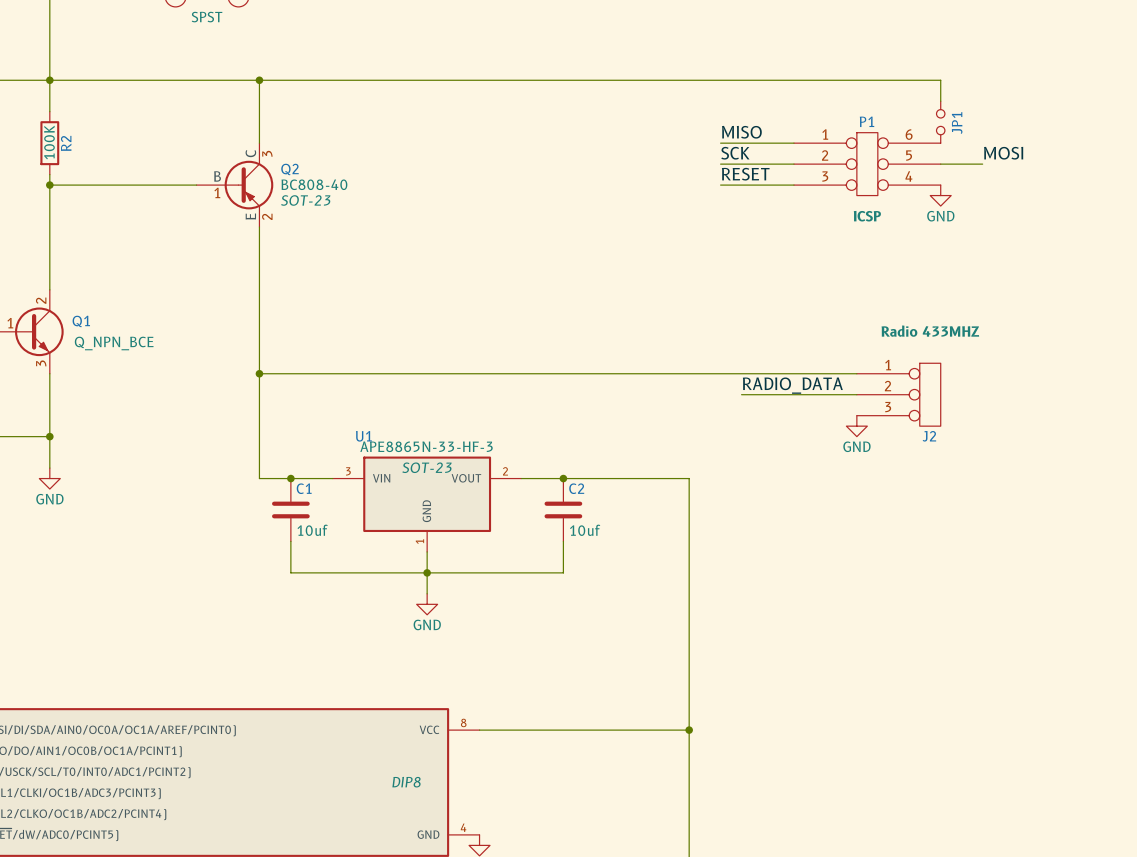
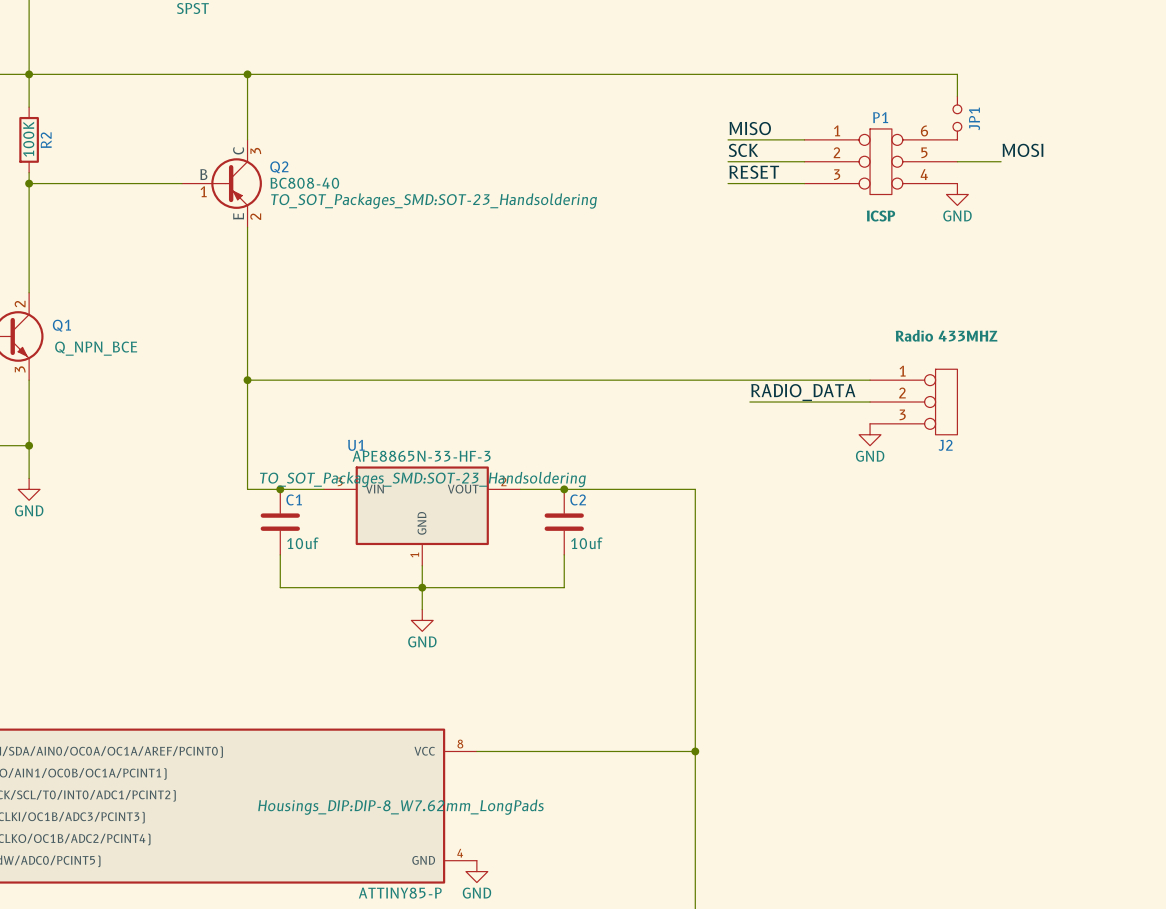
Q2 text: SOT-23 (305, 200) -> TO_SOT_Packages_SMD:SOT-23_Handsoldering (434, 201)
U1 text: SOT-23 (426, 467) -> TO_SOT_Packages_SMD:SOT-23_Handsoldering (422, 479)
part text: DIP8 (406, 782) -> Housings_DIP:DIP-8_W7.62mm_LongPads (400, 807)

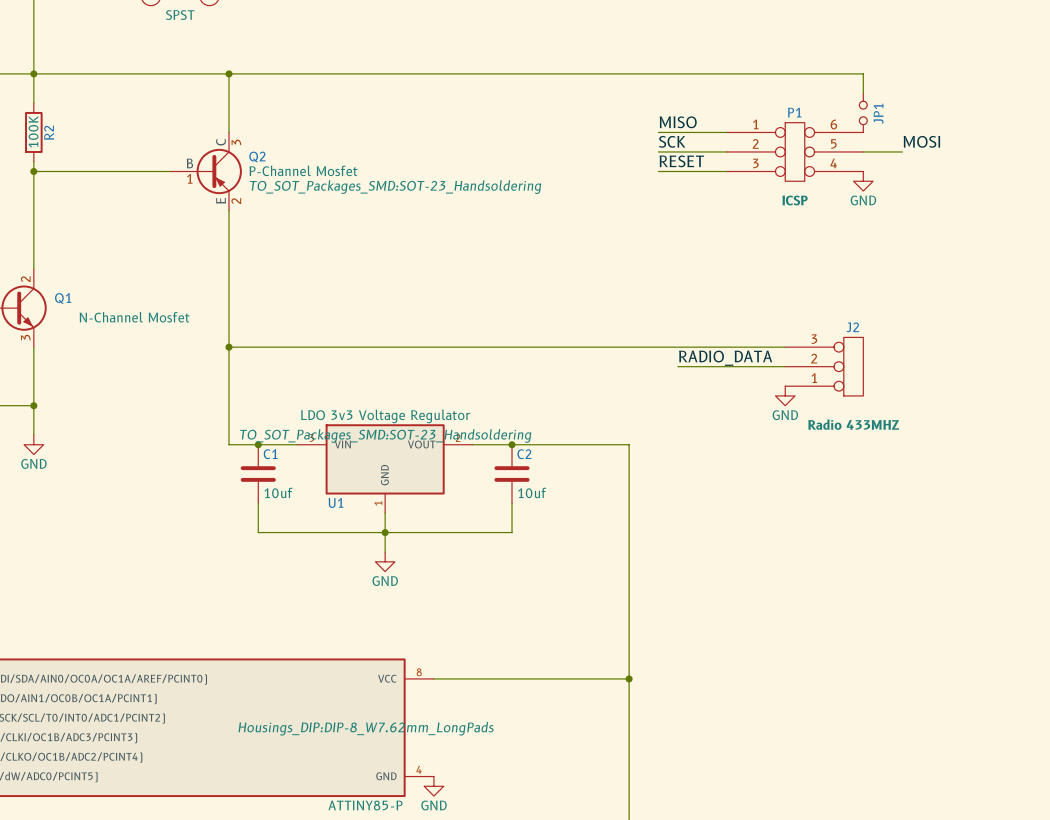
Q2 value: BC808-40 (304, 183) -> P-Channel Mosfet (303, 170)
Q1 value: Q_NPN_BCE (96, 348) -> N-Channel Mosfet (134, 317)
J2 flip: as is (946, 402) -> up-down (853, 366)
U1 name position: U1 (356, 445) -> U1 (336, 502)
U1 value: APE8865N-33-HF-3 (421, 456) -> LDO 3v3 Voltage Regulator (385, 416)

